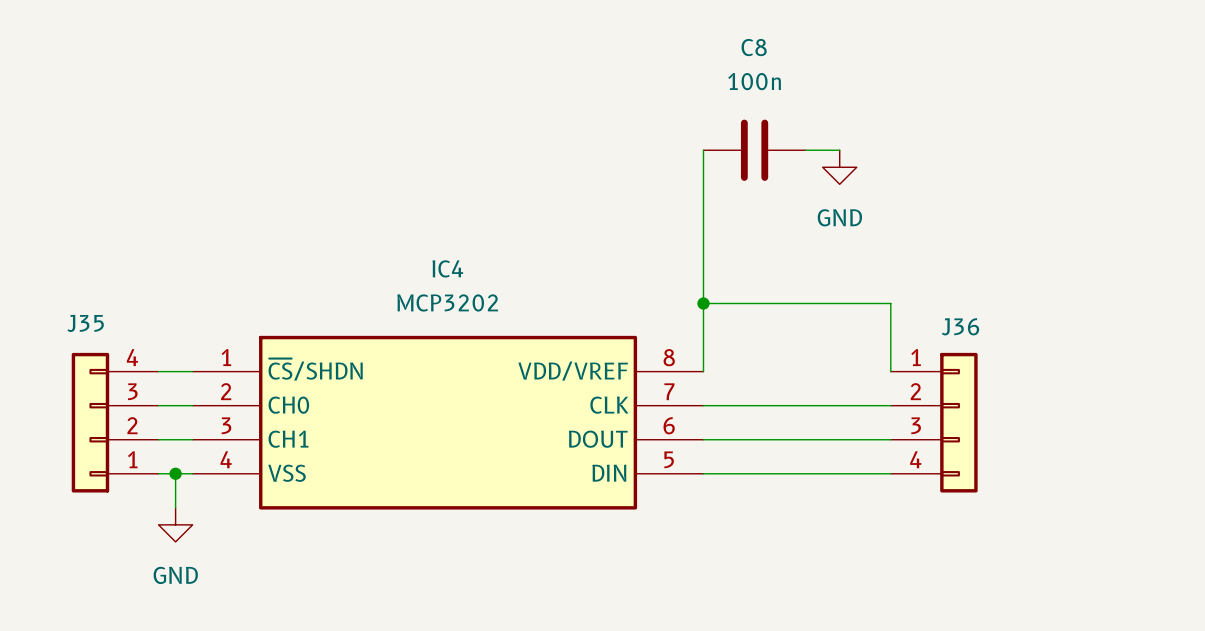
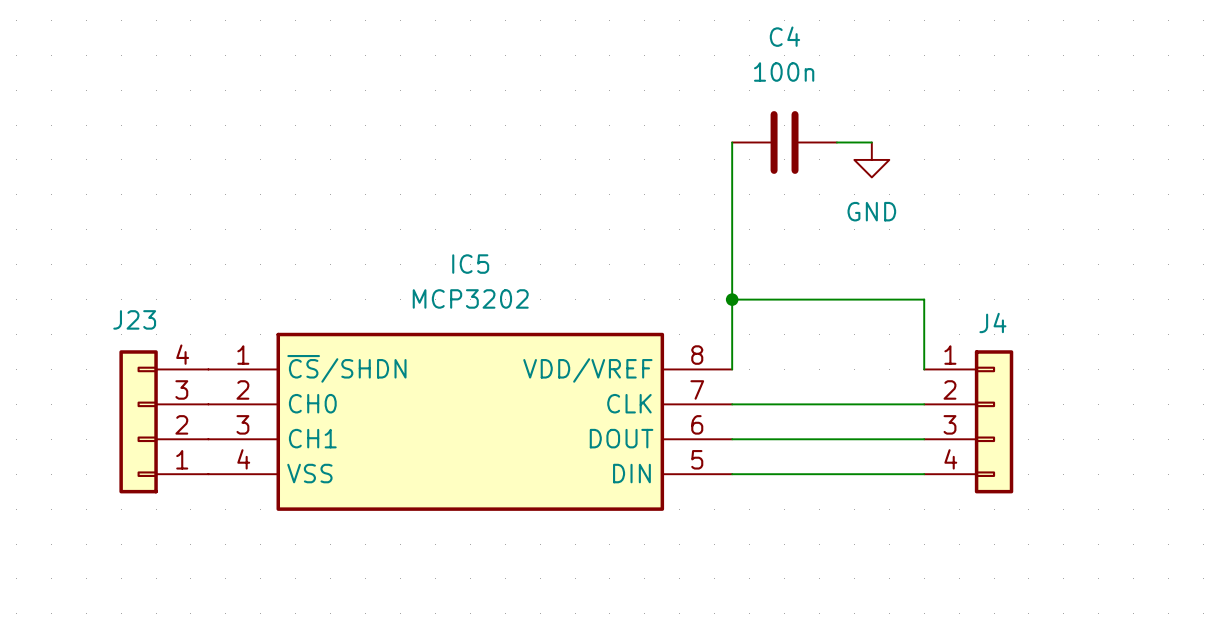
C8 name: C8 (754, 47) -> C4 (784, 36)
IC4 name: IC4 (447, 268) -> IC5 (470, 264)
J36 name: J36 (960, 326) -> J4 (992, 322)
J35: (115, 422) -> none
J23: none -> (163, 421)
wire: (175, 473) (175, 507) -> none
junction: (175, 473) -> none
power symbol: GND (175, 524) -> none

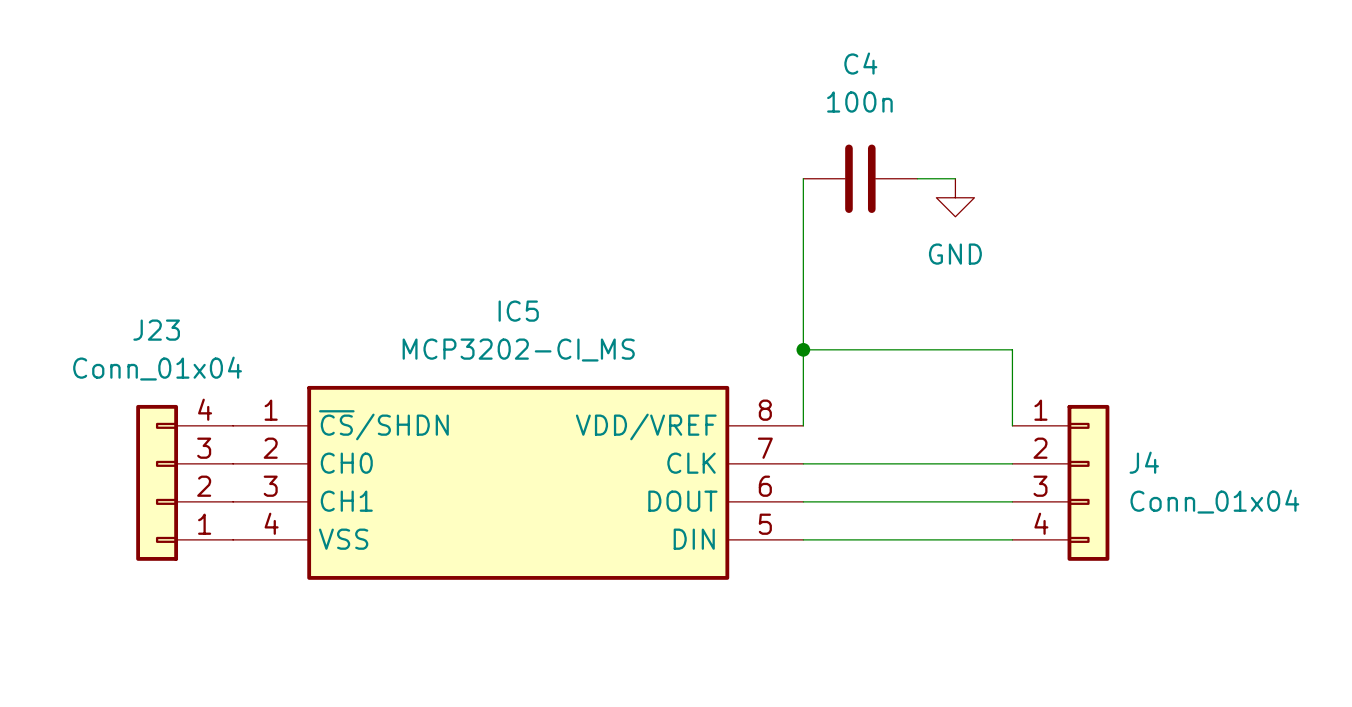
IC5 value: MCP3202 (470, 298) -> MCP3202-CI_MS (518, 350)
J23 value: none -> Conn_01x04 (157, 368)
J23 name position: J23 (134, 319) -> J23 (156, 330)
J4 name position: J4 (992, 322) -> J4 (1144, 462)
J4 value: none -> Conn_01x04 (1214, 501)

